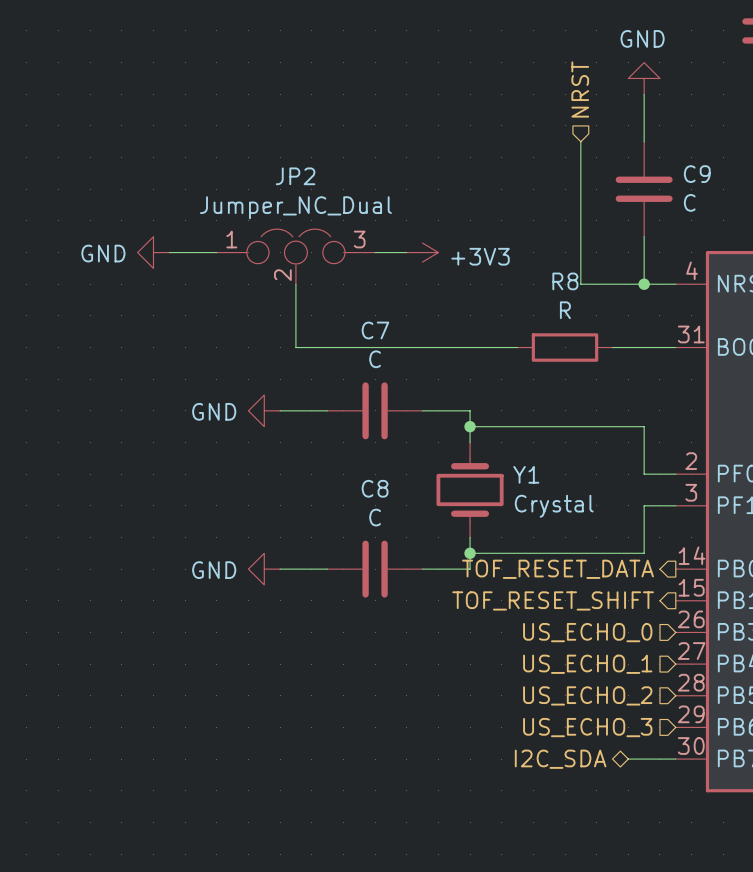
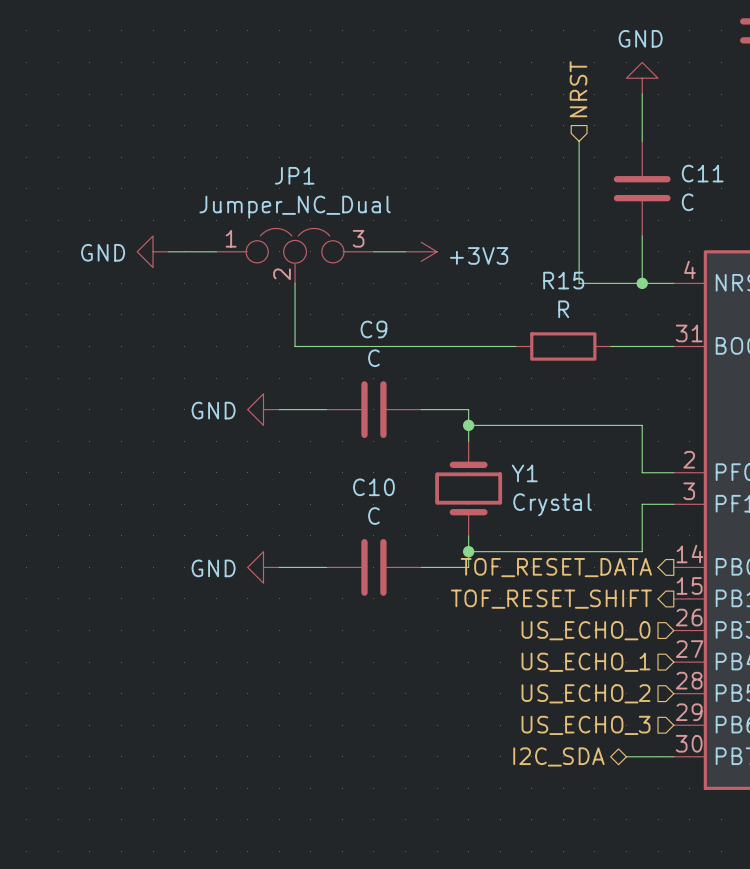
C9 name: C9 (697, 174) -> C11 (702, 173)
JP2 name: JP2 (295, 176) -> JP1 (294, 175)
R8 name: R8 (565, 281) -> R15 (563, 280)
C7 name: C7 (375, 330) -> C9 (373, 329)
C8 name: C8 (375, 488) -> C10 (373, 487)

